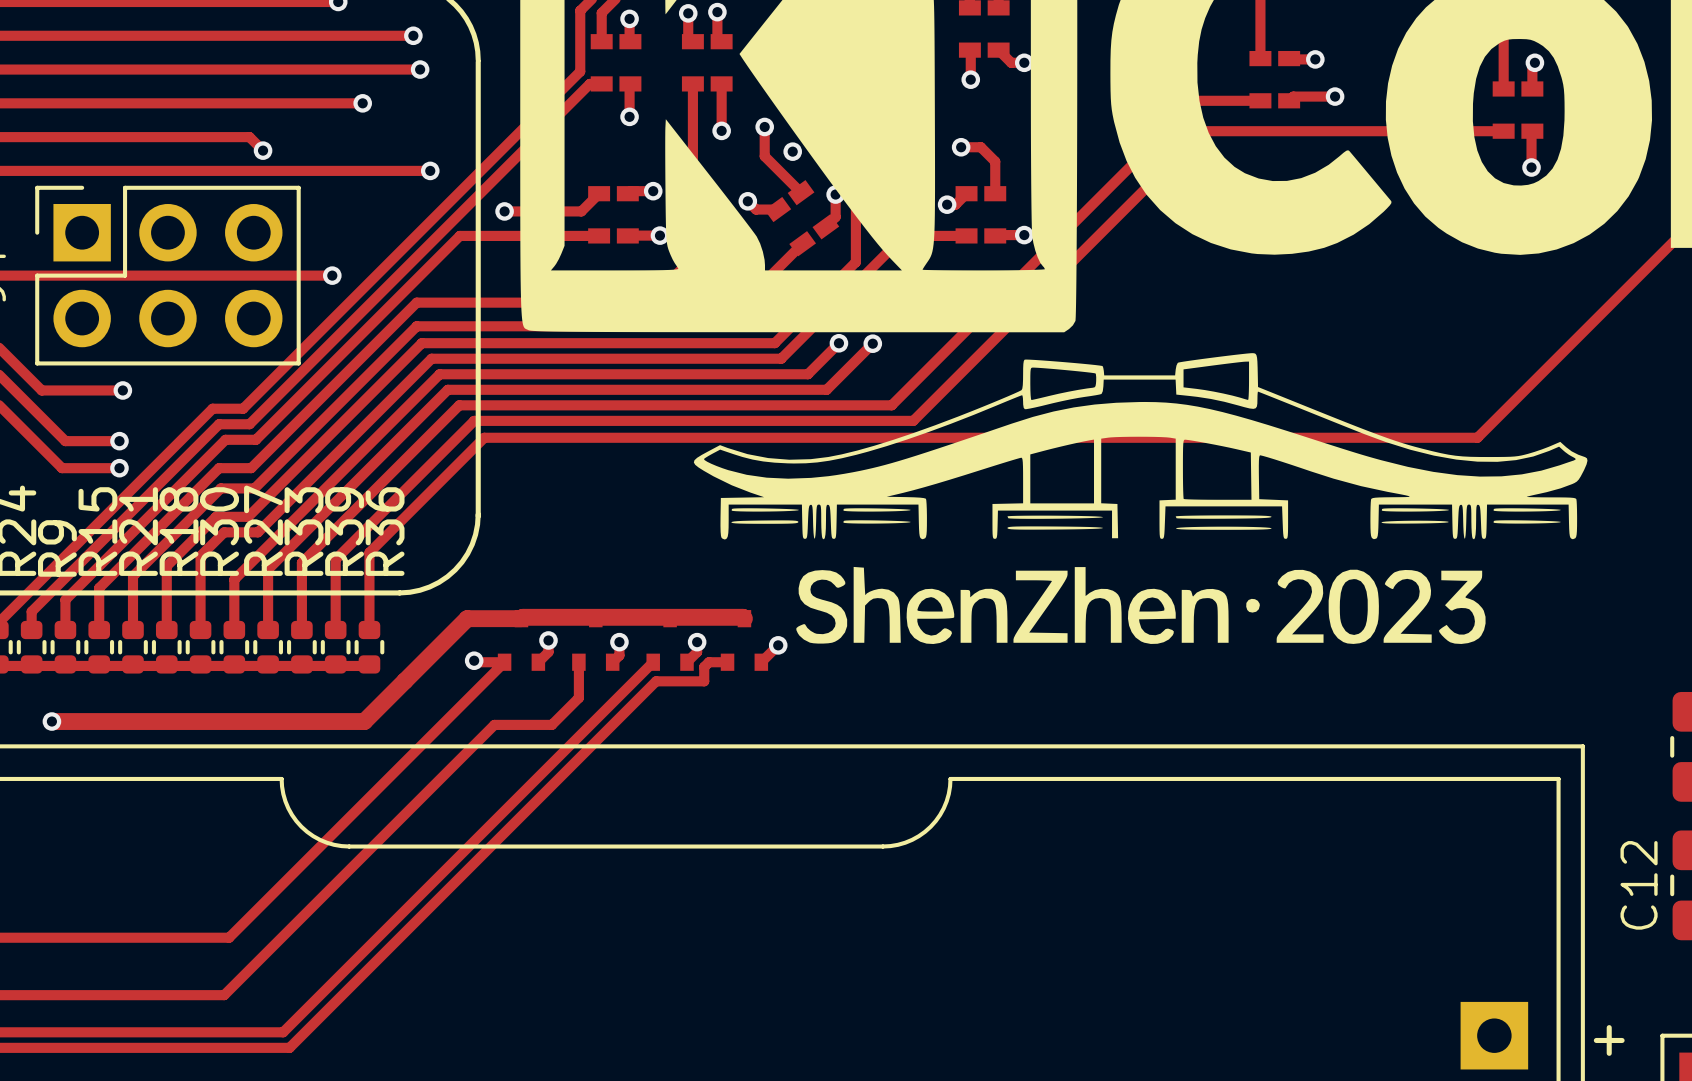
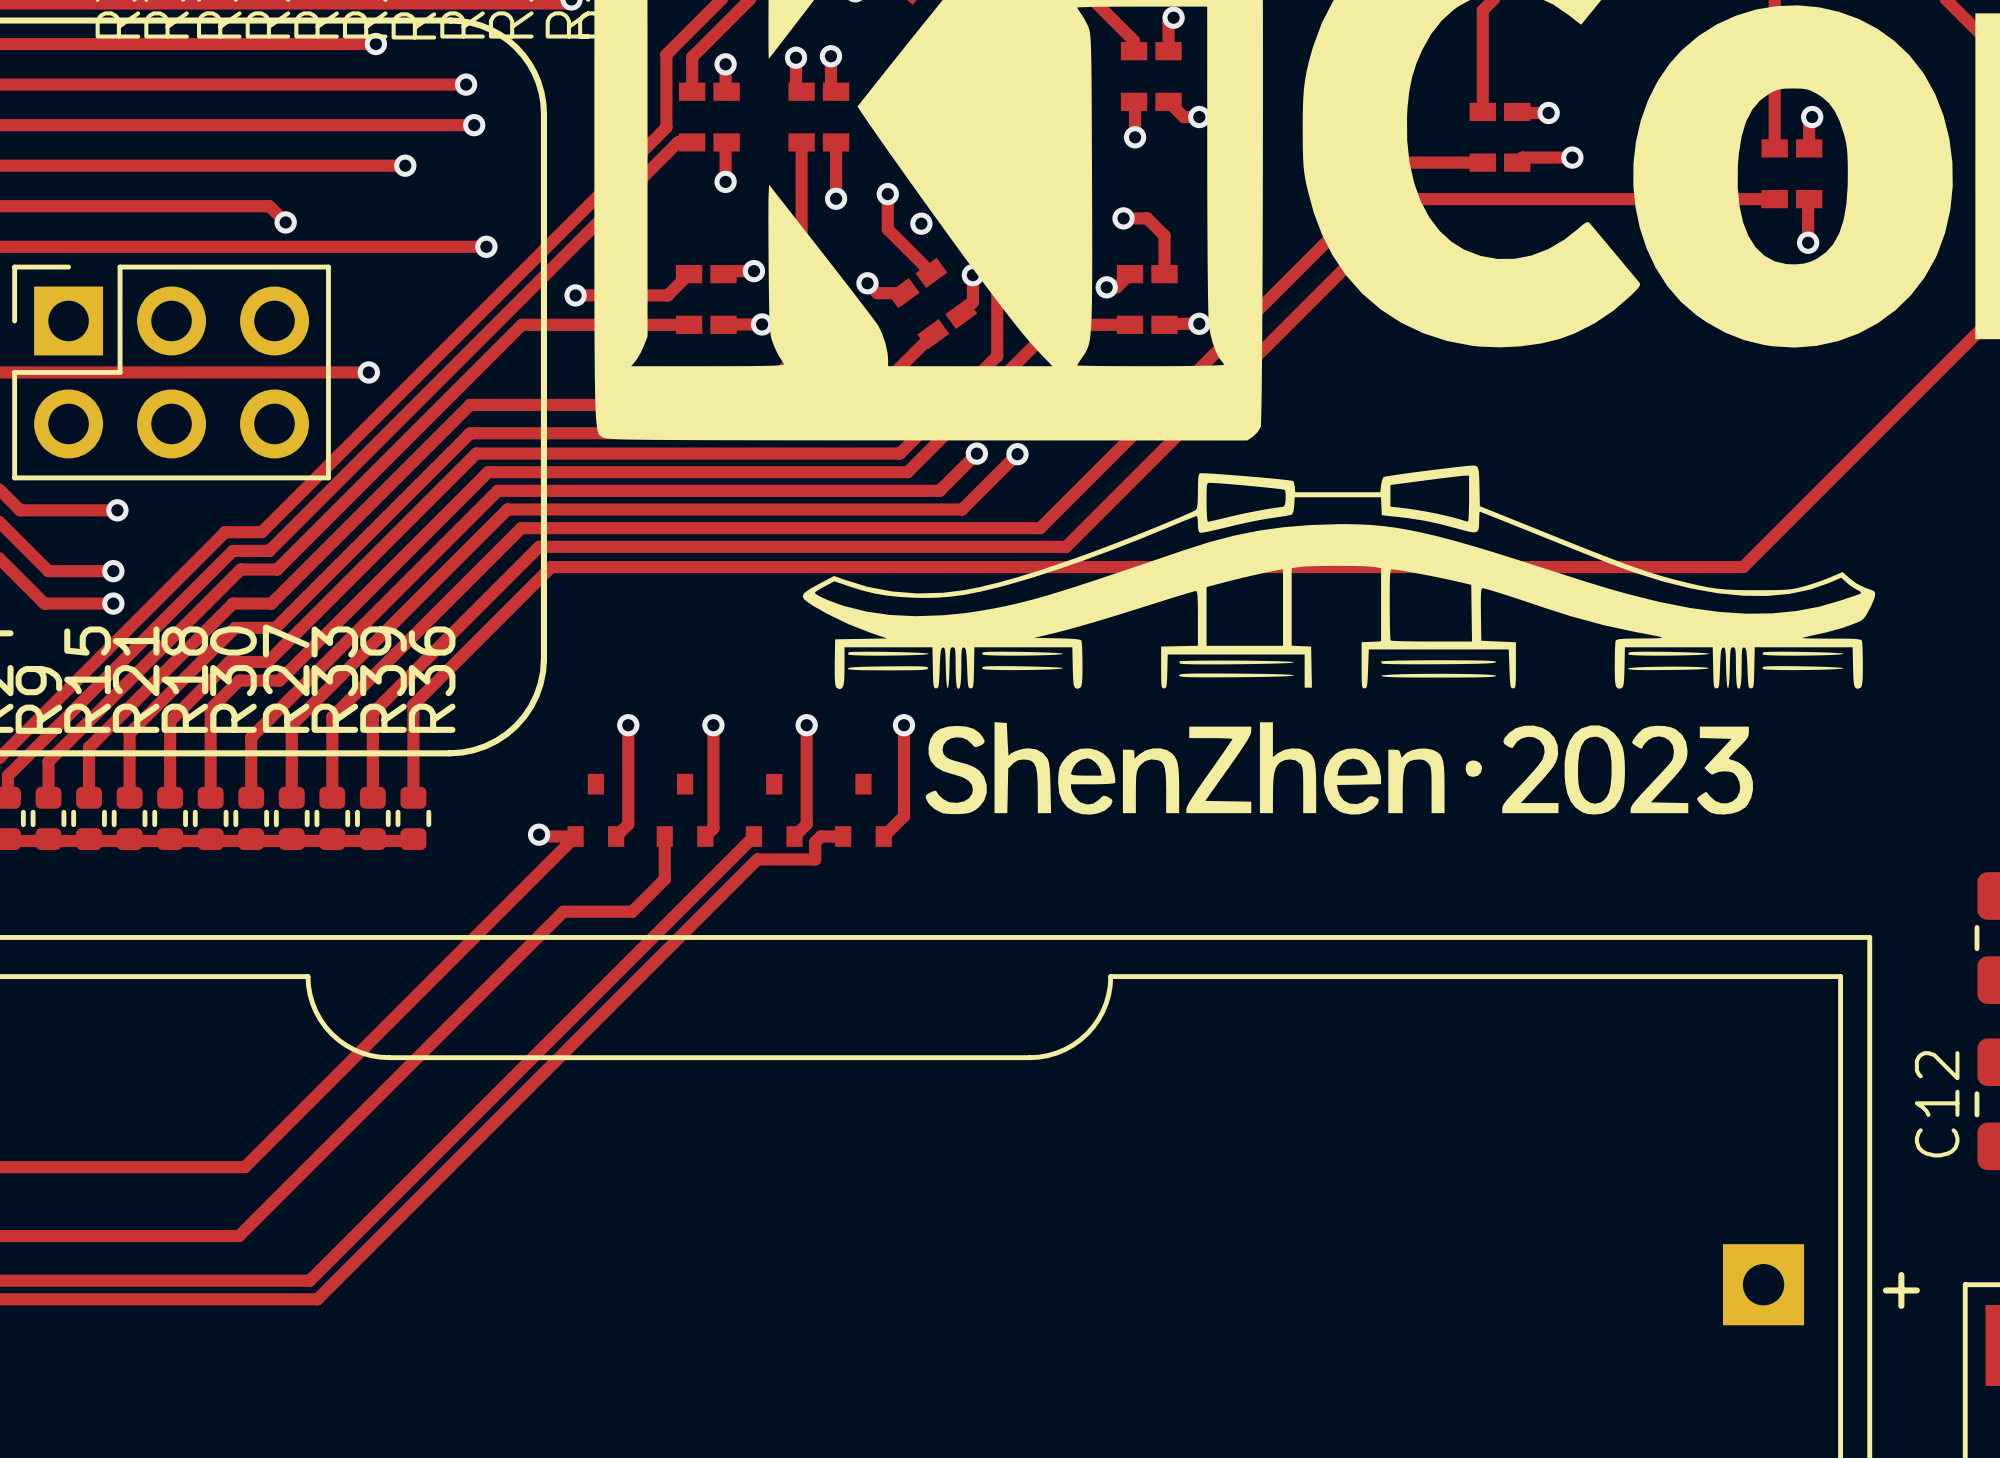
track: none -> (628, 725) (628, 810)
via: none -> (628, 725)
track: none -> (713, 725) (713, 812)
via: none -> (713, 725)
track: none -> (806, 725) (806, 812)
via: none -> (806, 725)
track: none -> (903, 725) (903, 816)
via: none -> (903, 725)
track: (744, 618) (467, 618) (364, 721) (51, 721) -> none
via: (548, 640) -> none
via: (619, 642) -> none
via: (697, 642) -> none
via: (778, 645) -> none
via: (51, 721) -> none

